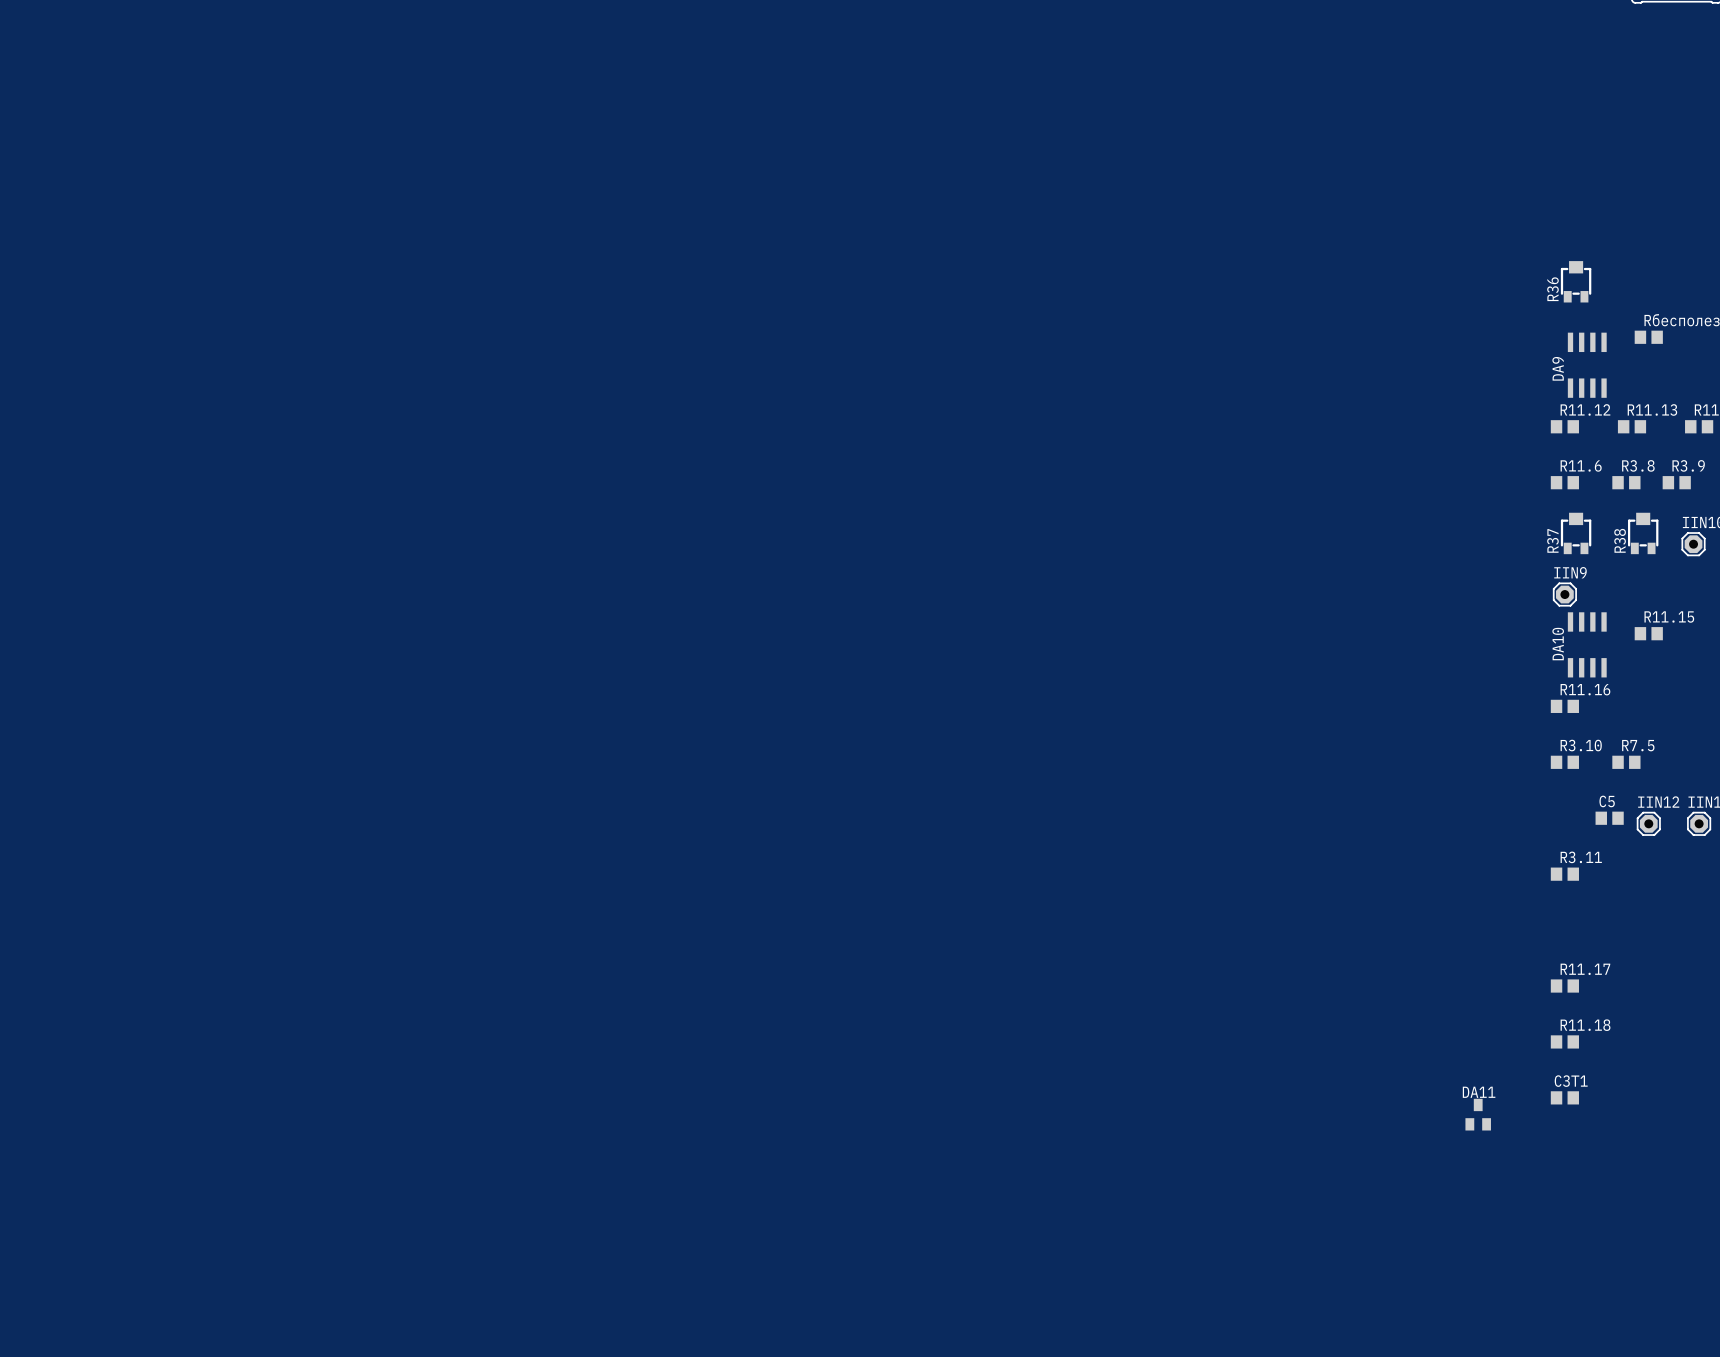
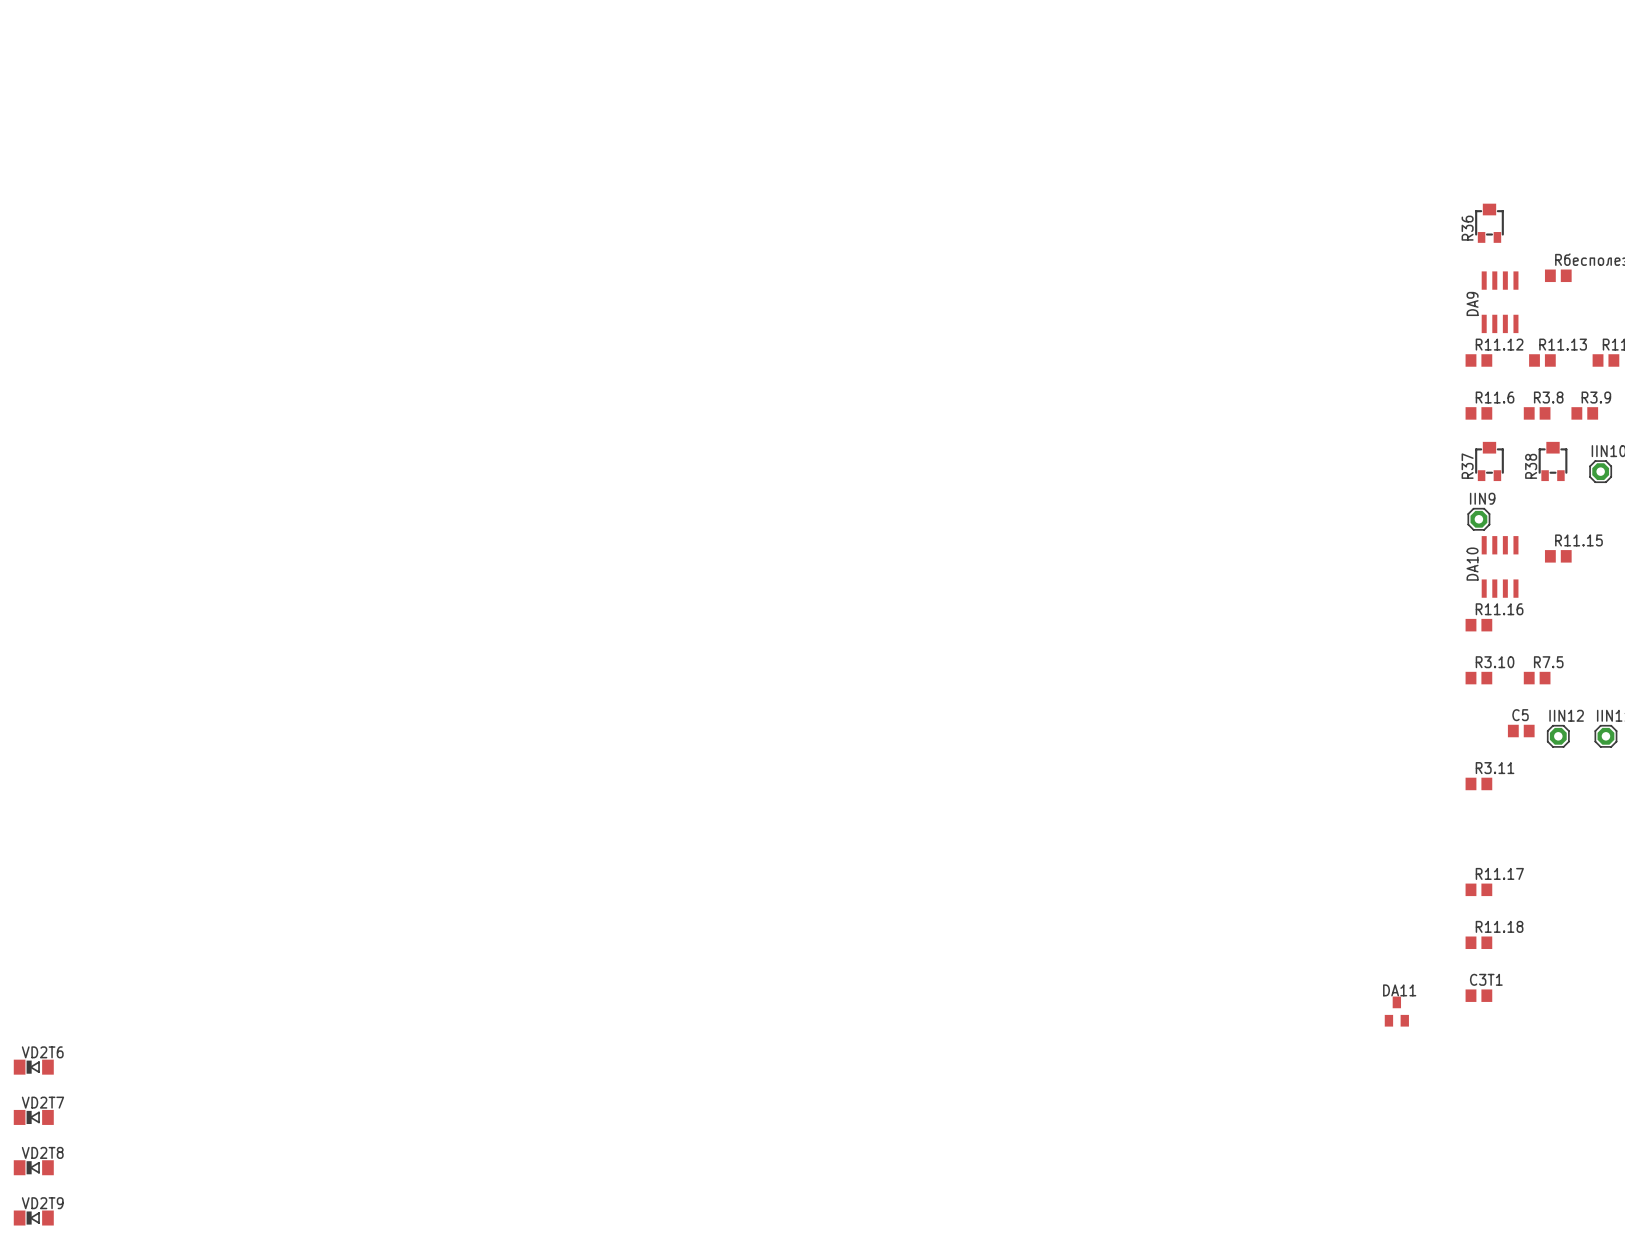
VD2T6: none -> (33, 1067)
VD2T7: none -> (33, 1117)
VD2T8: none -> (33, 1167)
VD2T9: none -> (33, 1218)

